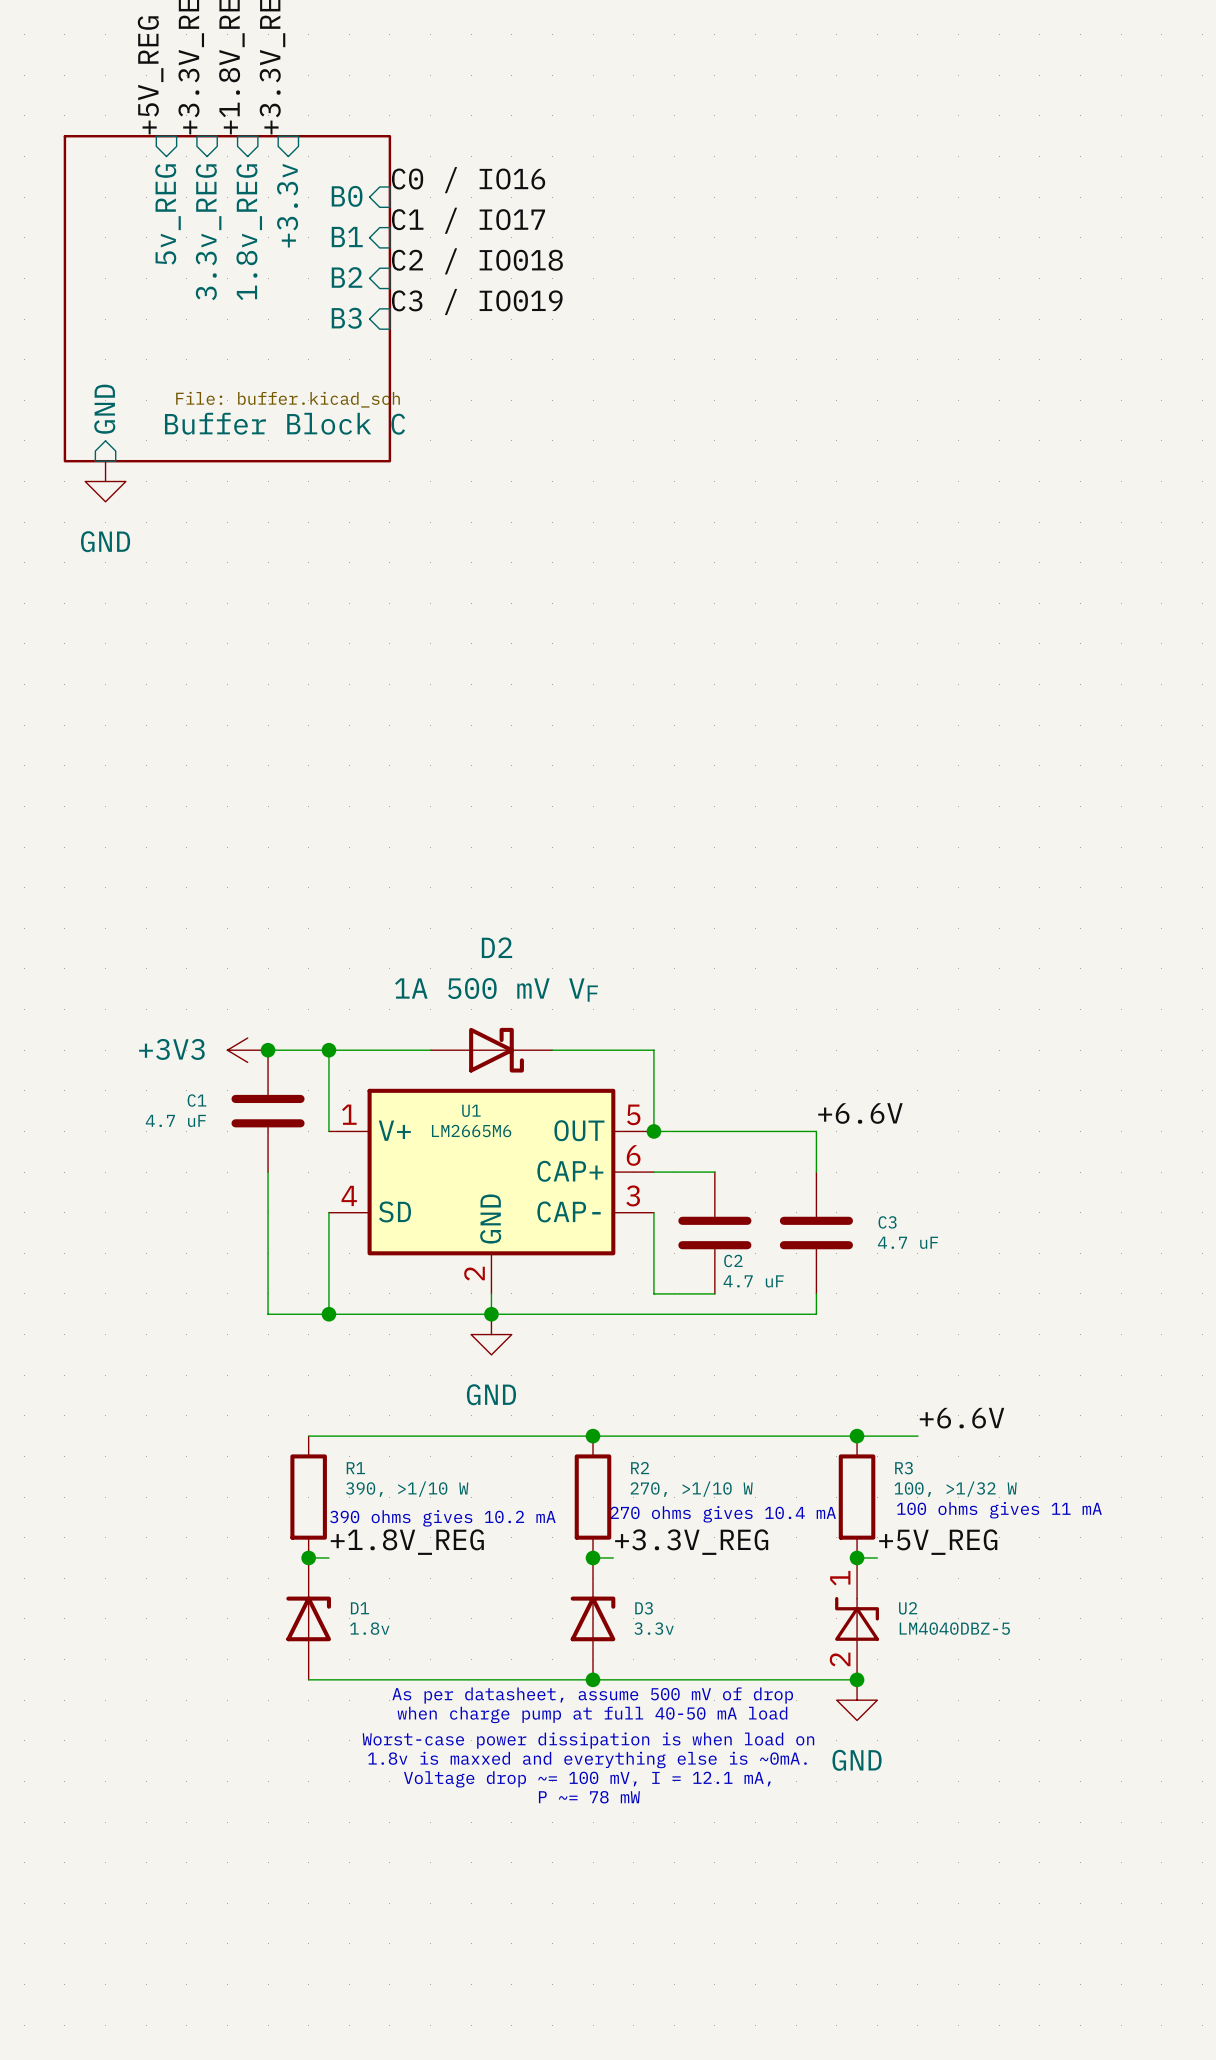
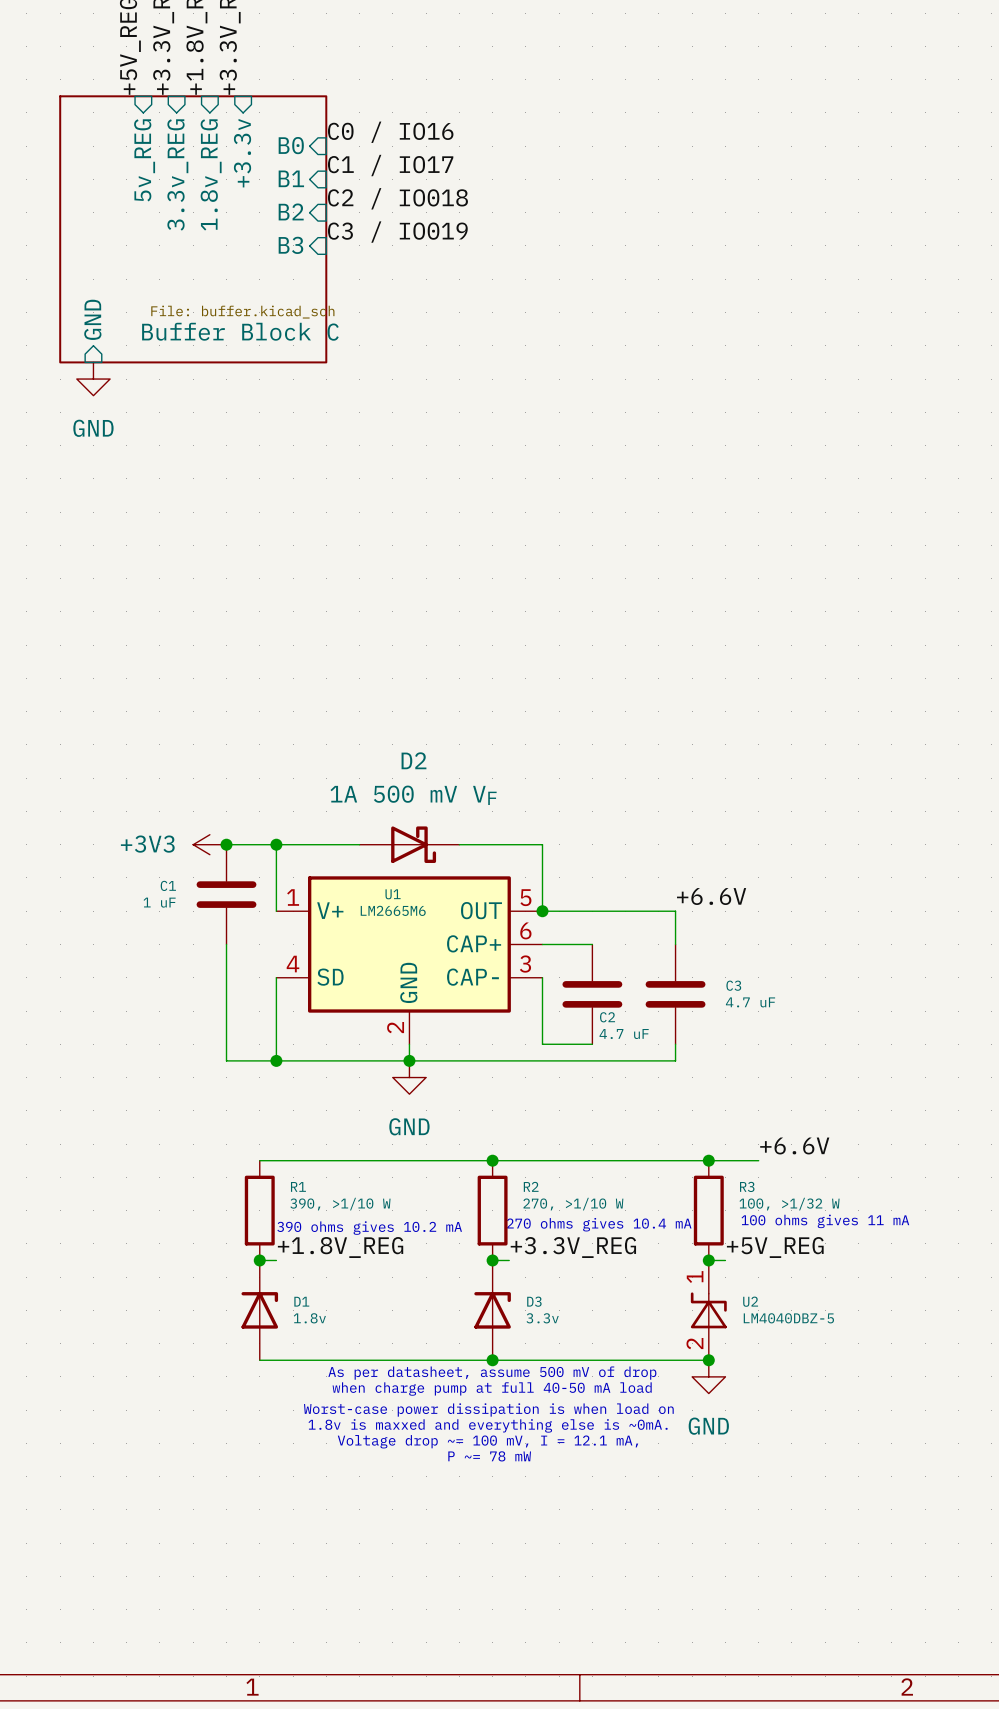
C1 value: 4.7 uF (175, 1120) -> 1 uF (159, 902)

